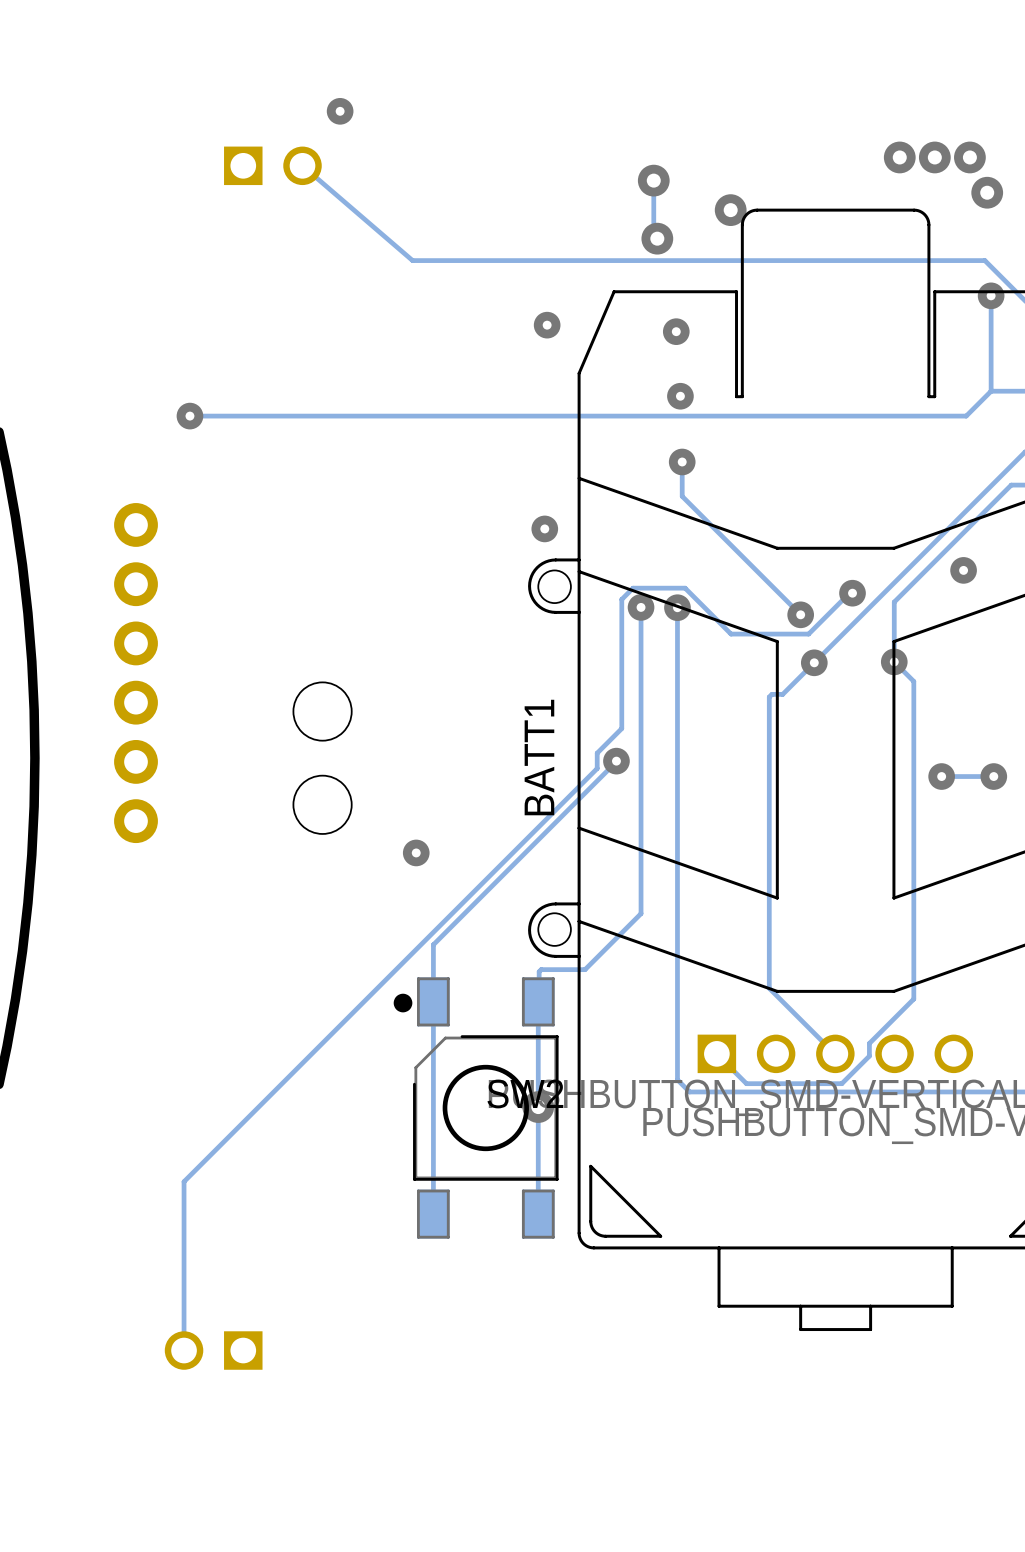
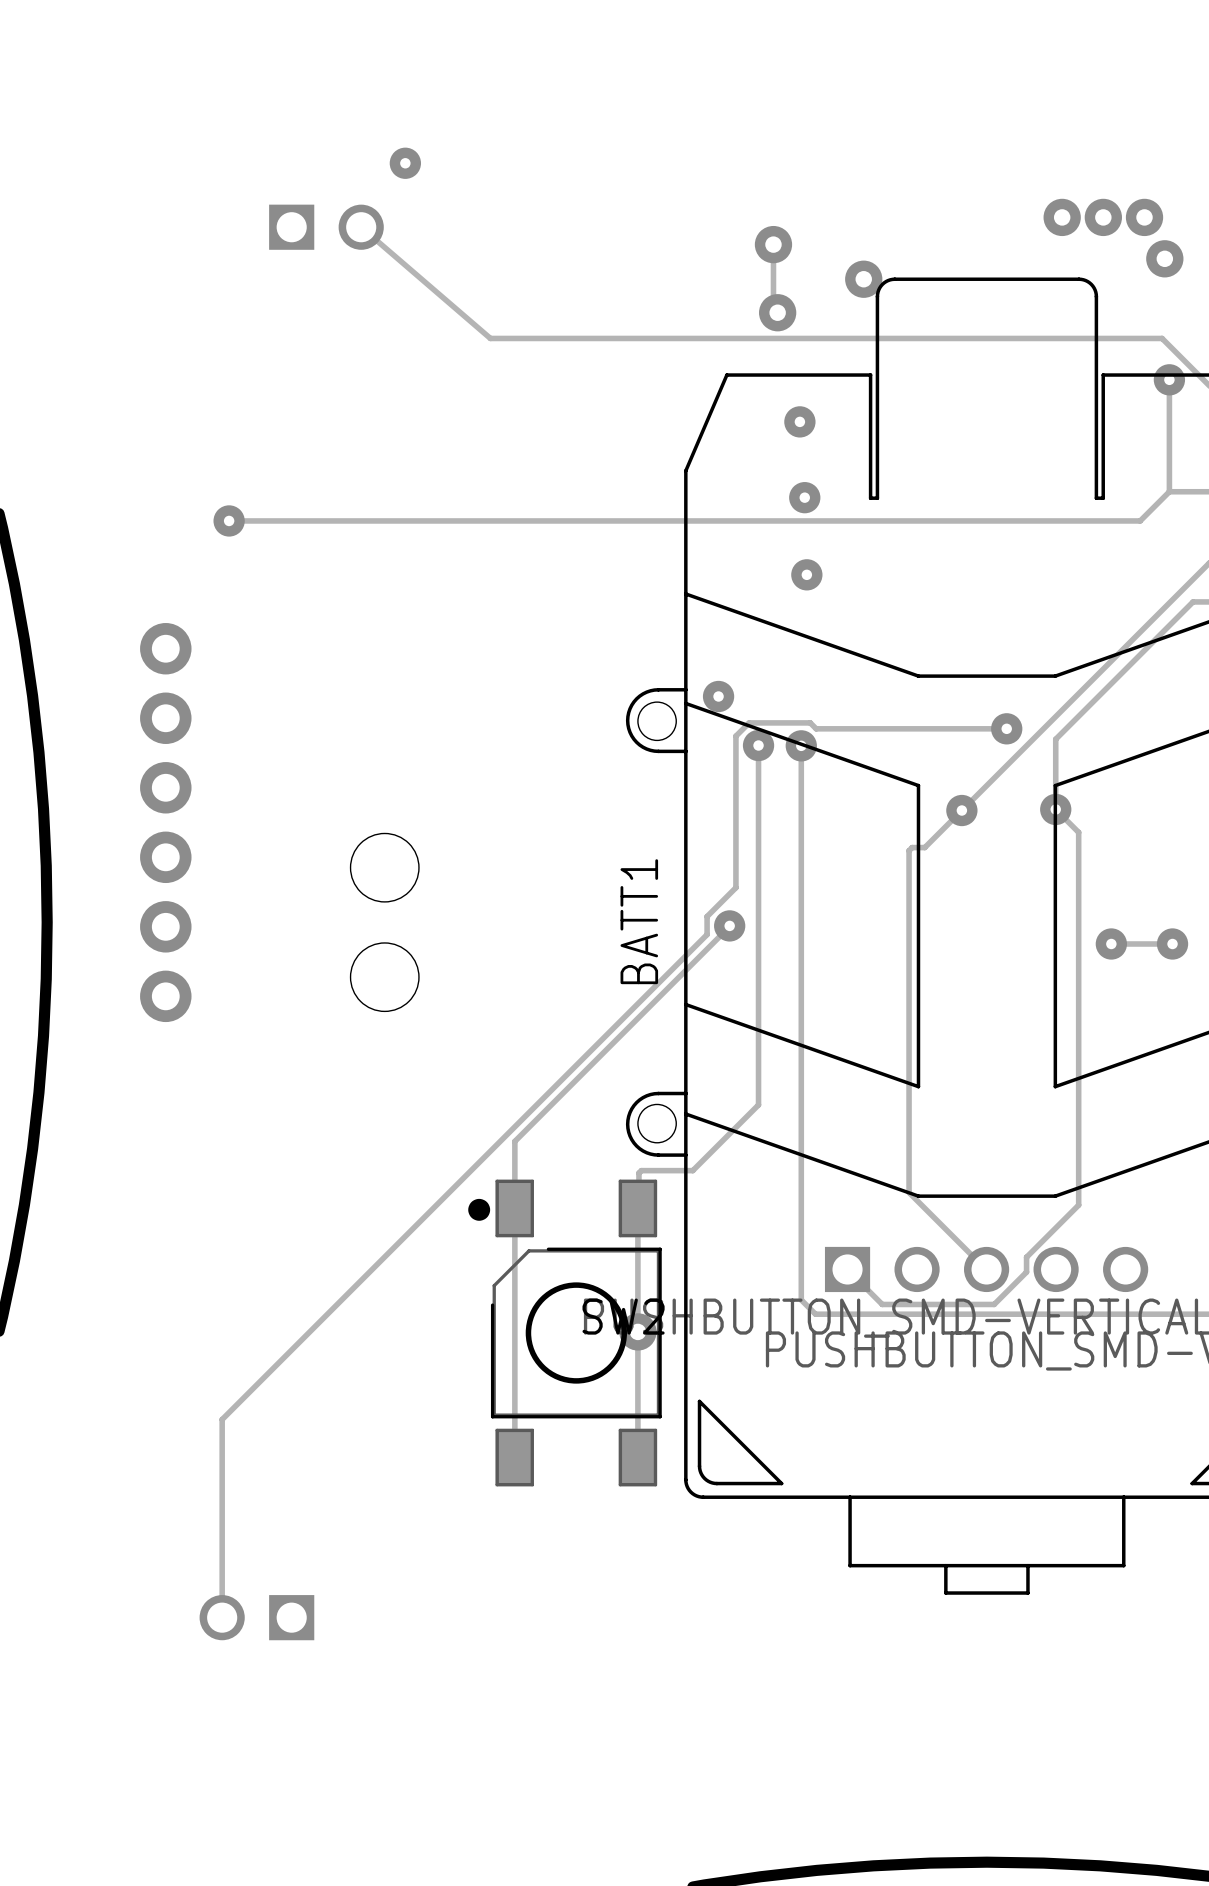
via: (547, 325) -> none
track: (682, 461) (682, 496) (800, 614) -> none
via position: (544, 528) -> (718, 696)
via: (963, 570) -> none
track: (849, 593) (808, 634) (731, 634) (690, 593) -> (1003, 728) (816, 728)
via: (800, 614) -> none
via: (416, 852) -> none

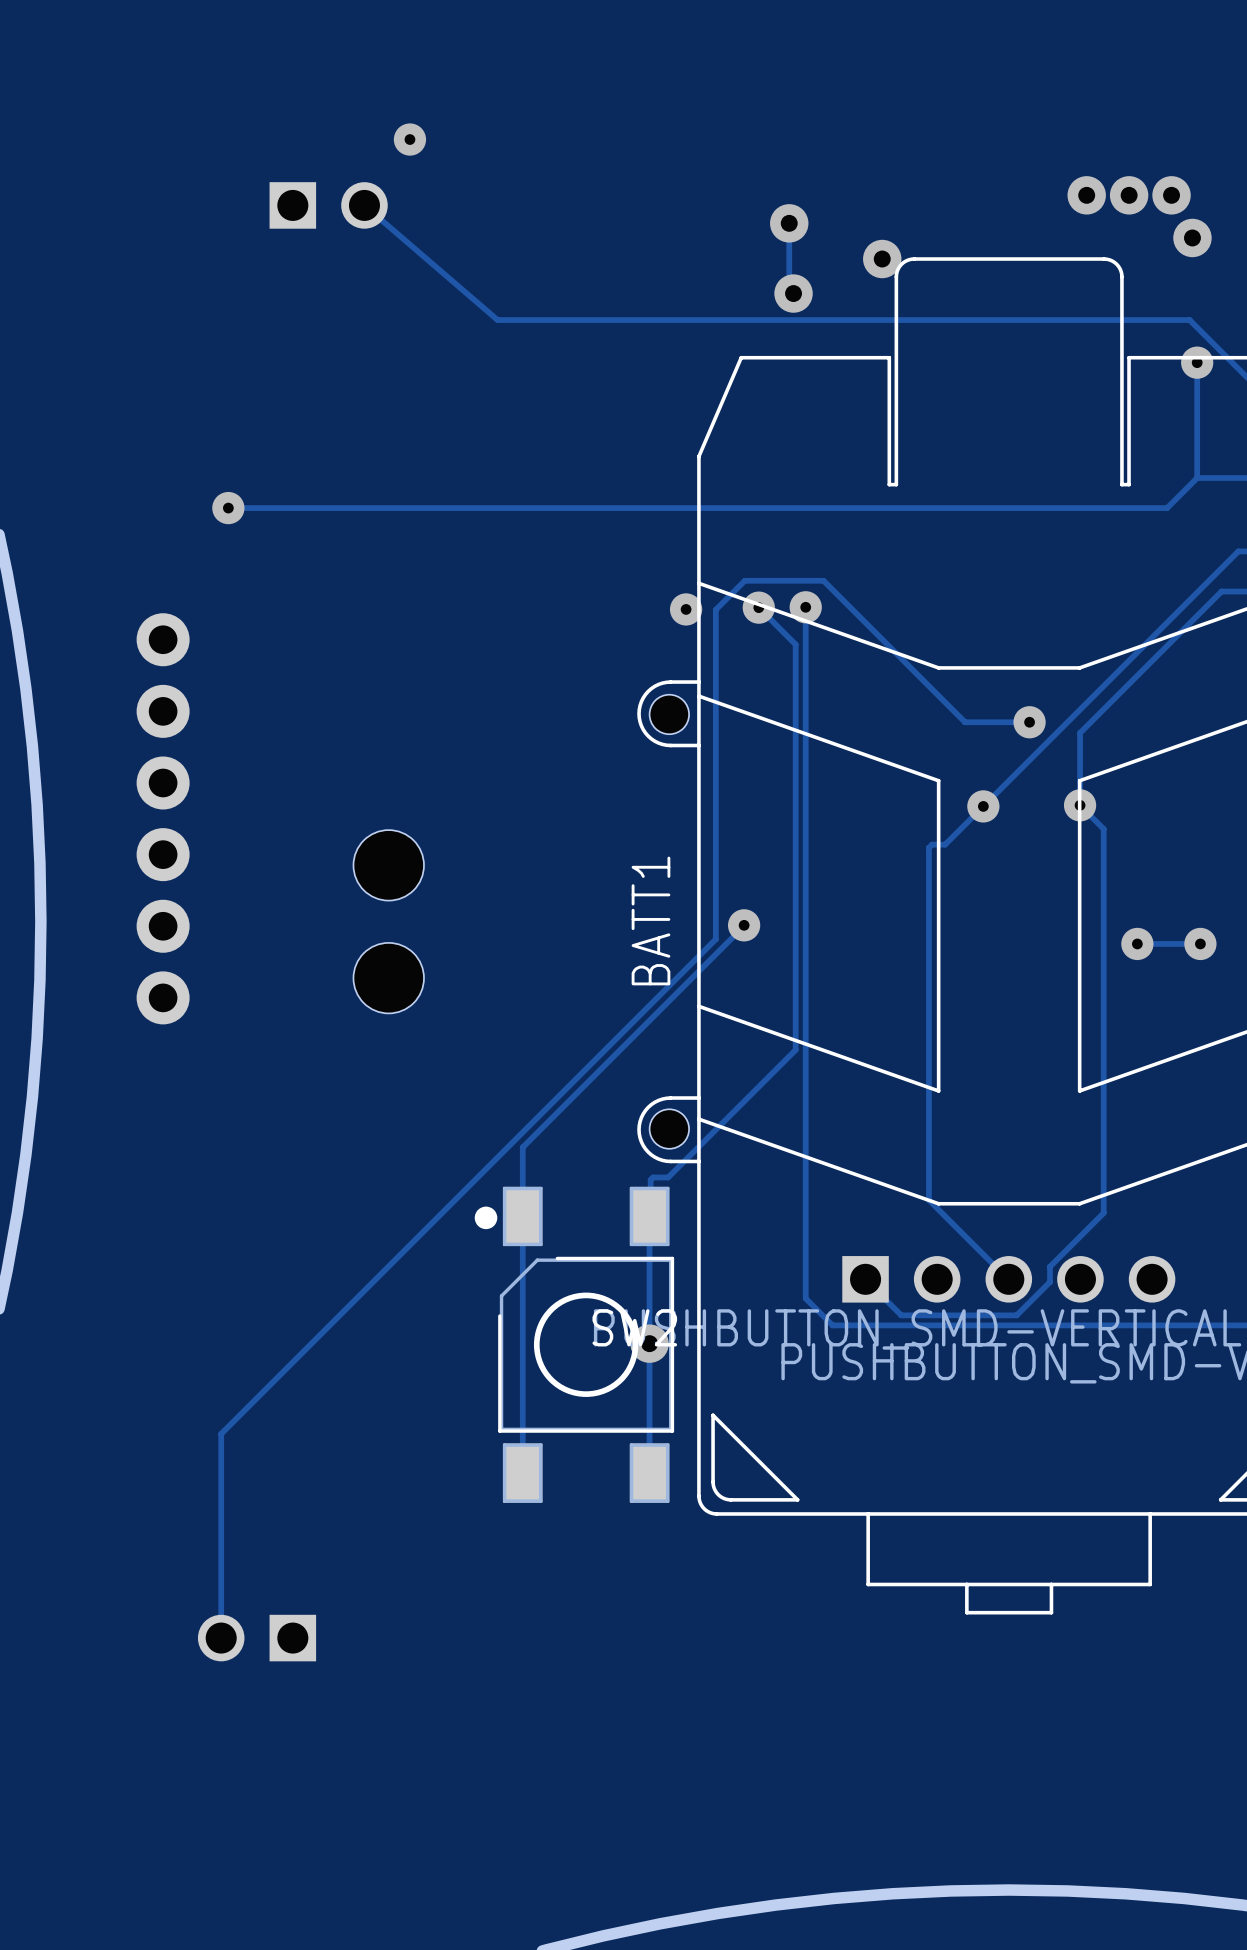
via: (799, 421) -> none
via: (804, 497) -> none
via: (806, 574) -> none
via: none -> (758, 607)
via: none -> (805, 607)
via: none -> (686, 609)
via: (718, 696) -> none
track: (944, 728) (816, 728) (810, 722) (749, 722) (735, 736) (735, 887) (707, 916) (707, 934) (702, 939) -> (965, 722) (823, 580) (744, 580) (715, 609) (715, 939)
track: (758, 745) (758, 1104) (692, 1170) (655, 1170) -> (758, 607) (795, 644) (795, 1049) (668, 1177)
via: (758, 745) -> none
track: (801, 745) (801, 1299) -> (805, 607) (805, 1298) (817, 1310)
via: (801, 745) -> none

